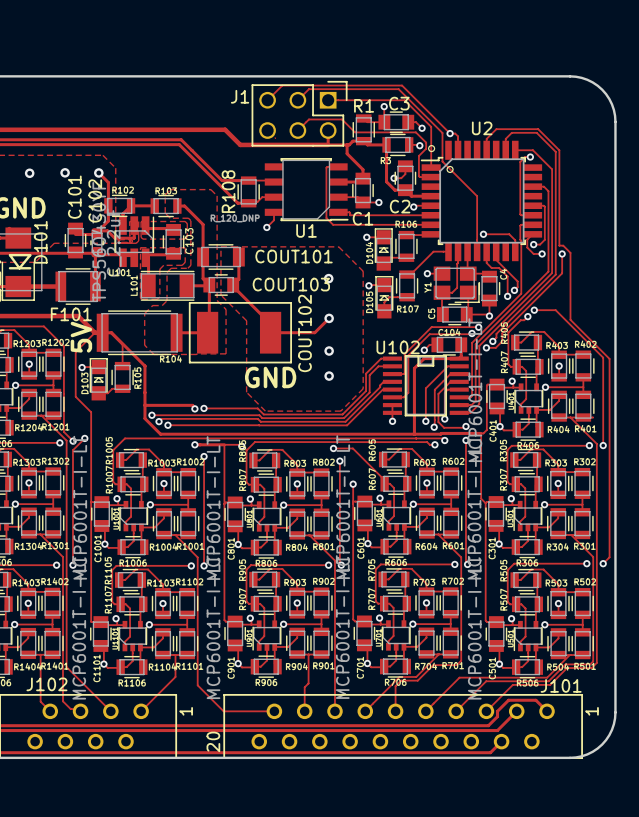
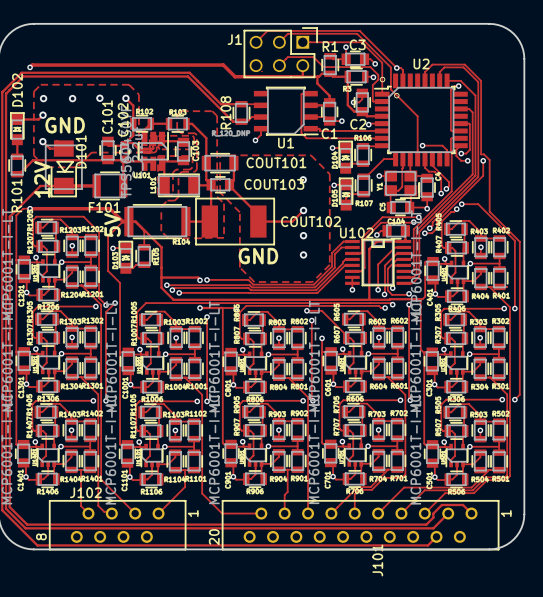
COUT102 name rotation: 0° (305, 333) -> 90° clockwise (310, 221)
J101 name rotation: 0° (561, 685) -> 90° counterclockwise (377, 560)
J101 name position: J101 (561, 685) -> J101 (377, 560)

